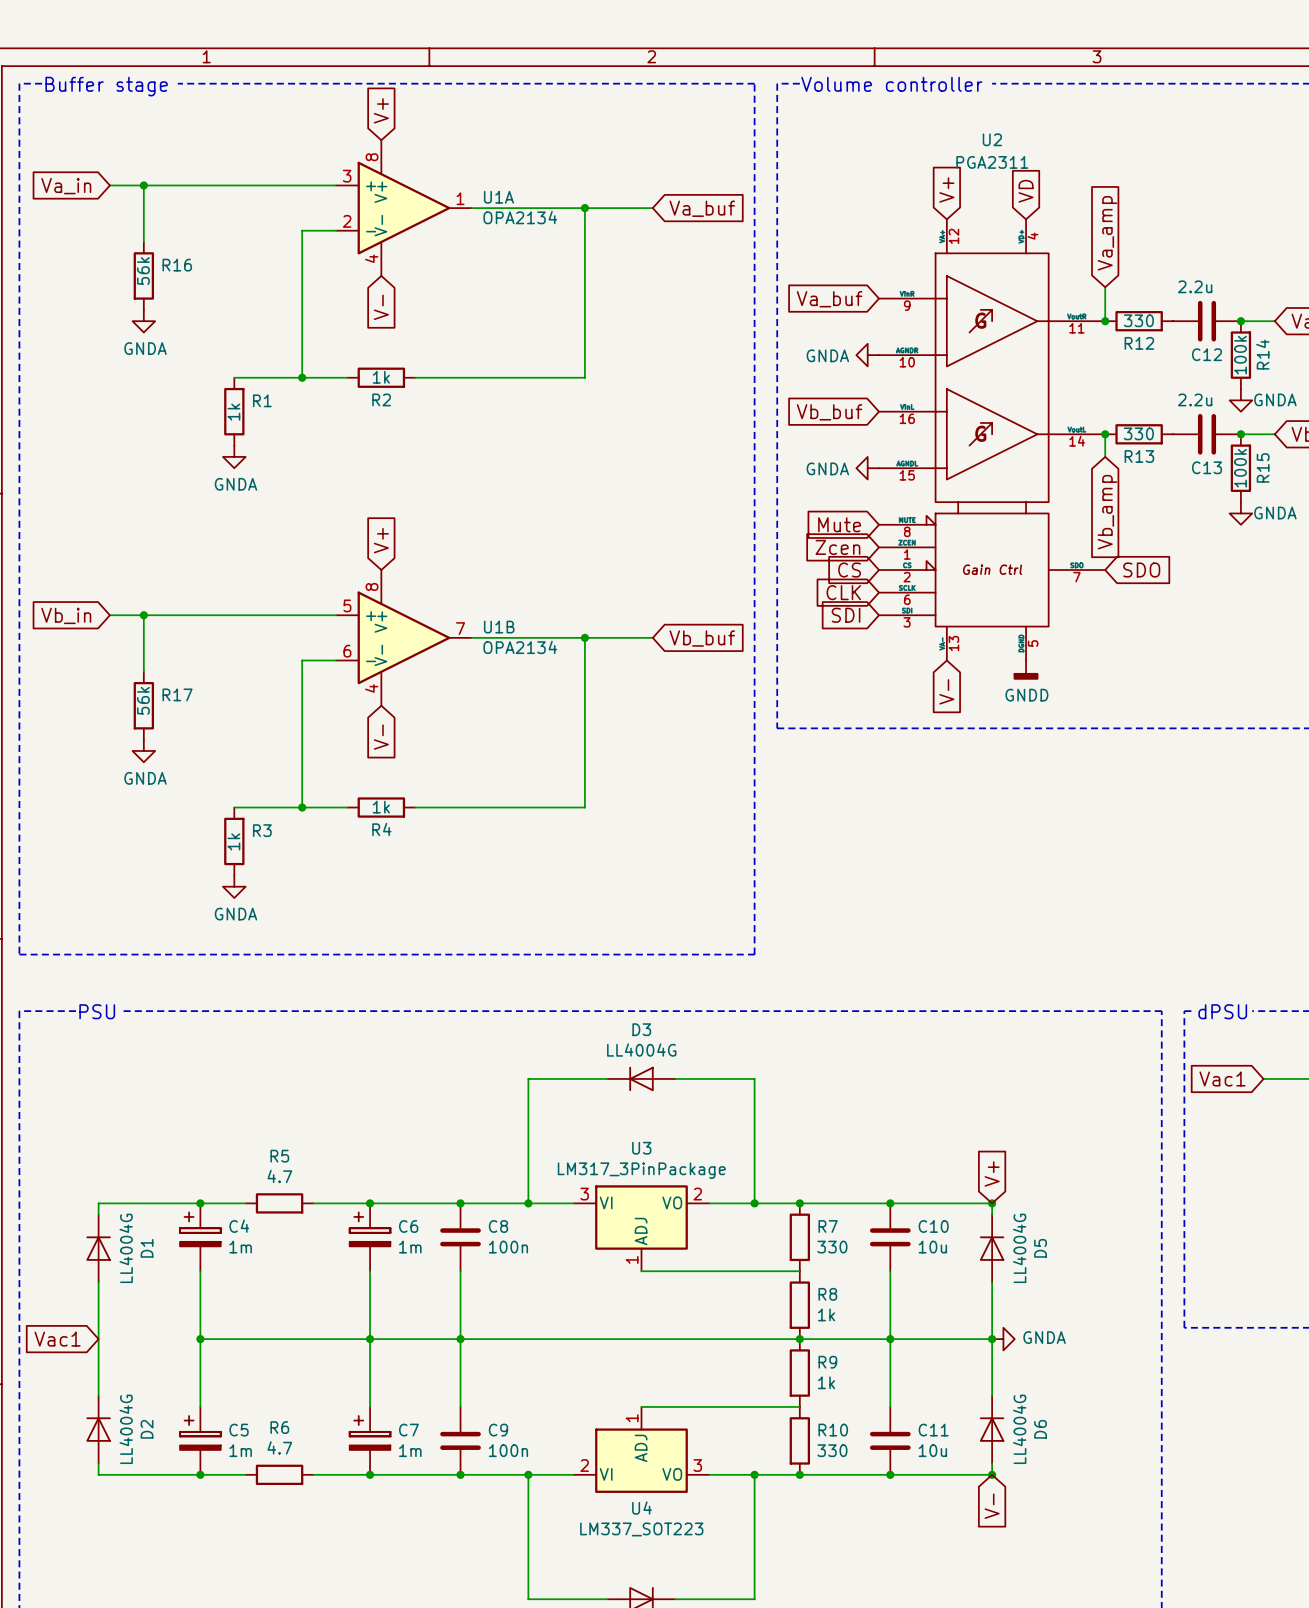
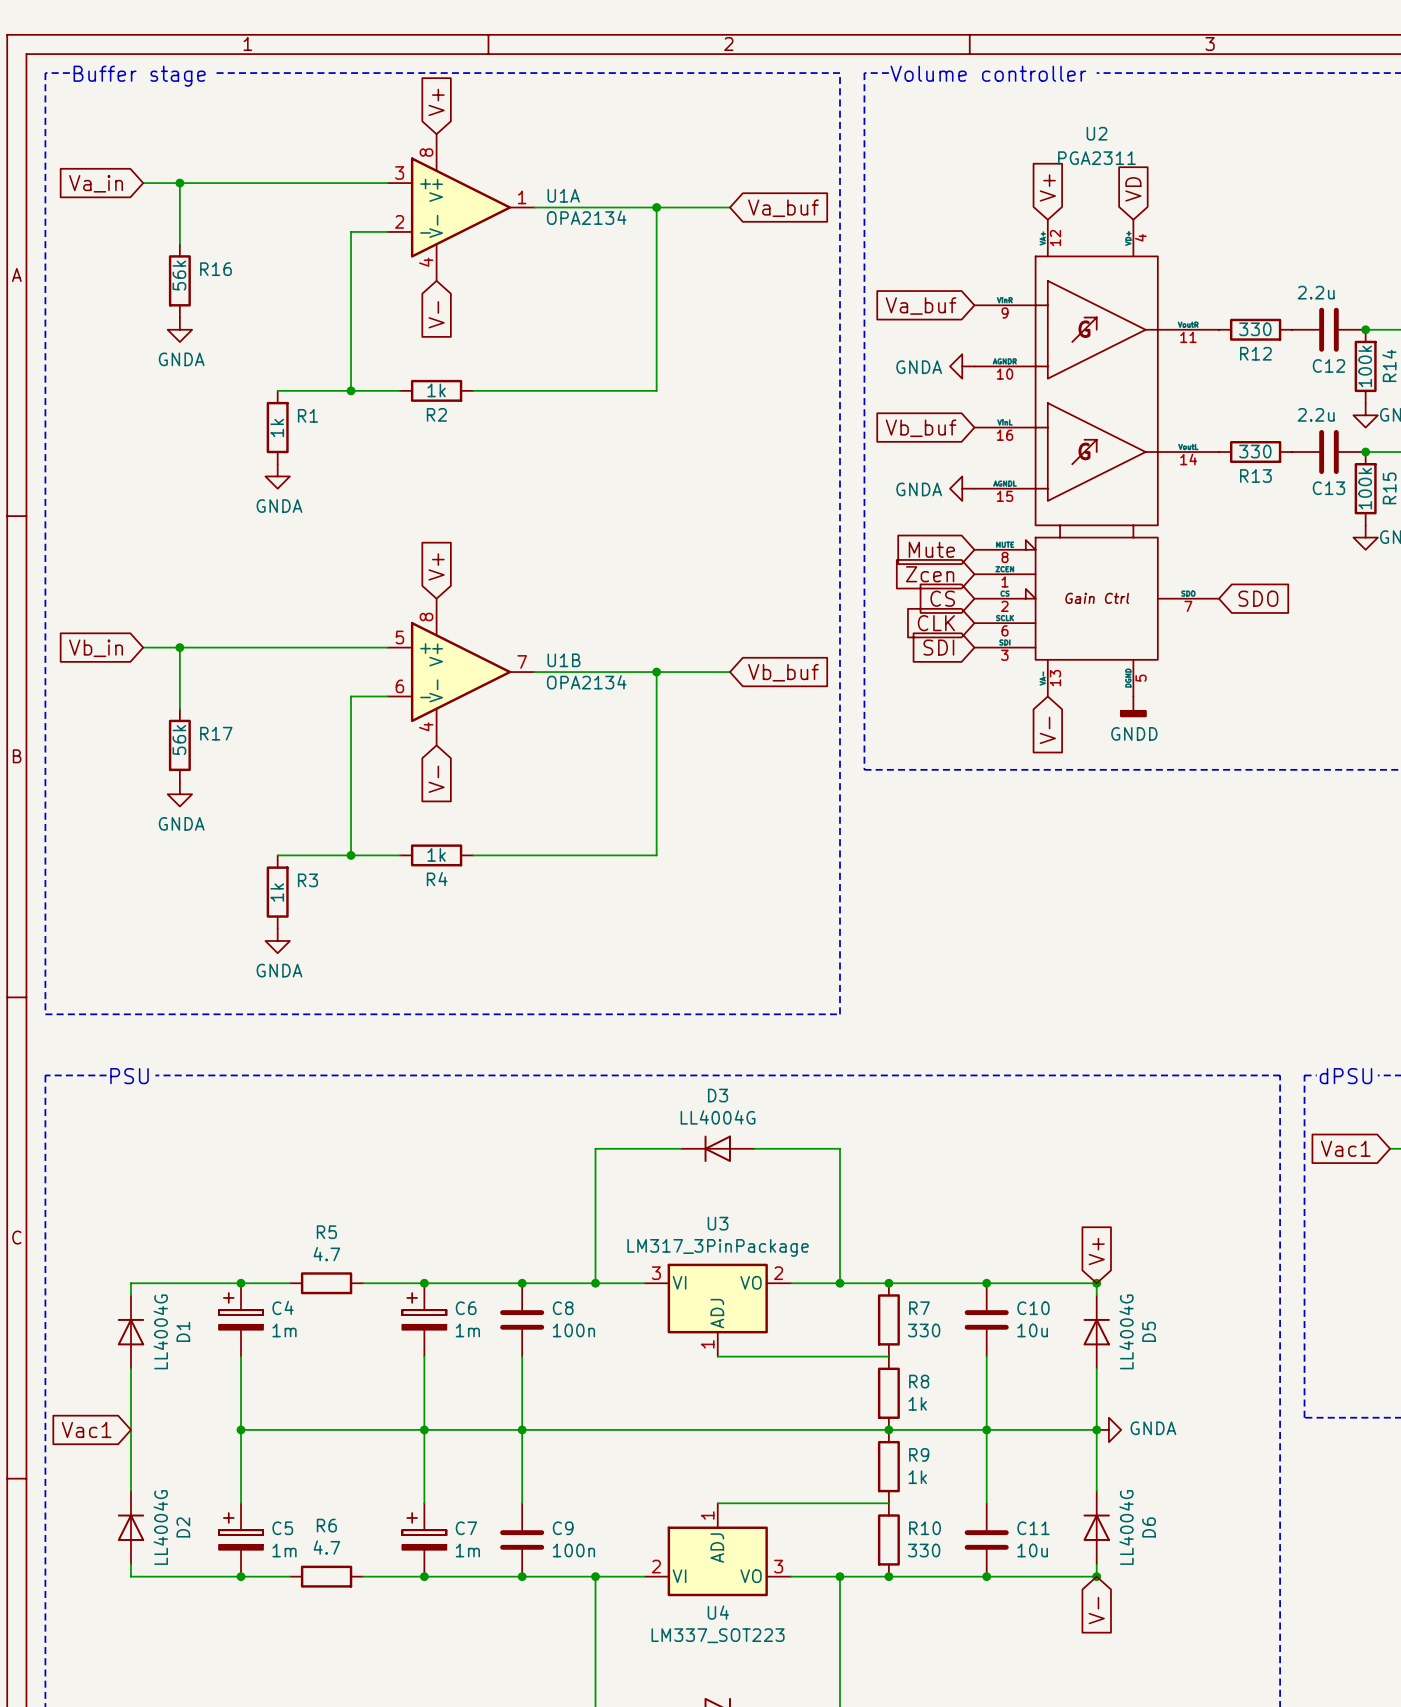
global label: Va_amp (1107, 233) -> none
wire: (1105, 287) (1105, 321) -> none
junction: (1105, 321) -> none
wire: (1105, 434) (1105, 456) -> none
junction: (1105, 434) -> none
global label: Vb_amp (1107, 512) -> none

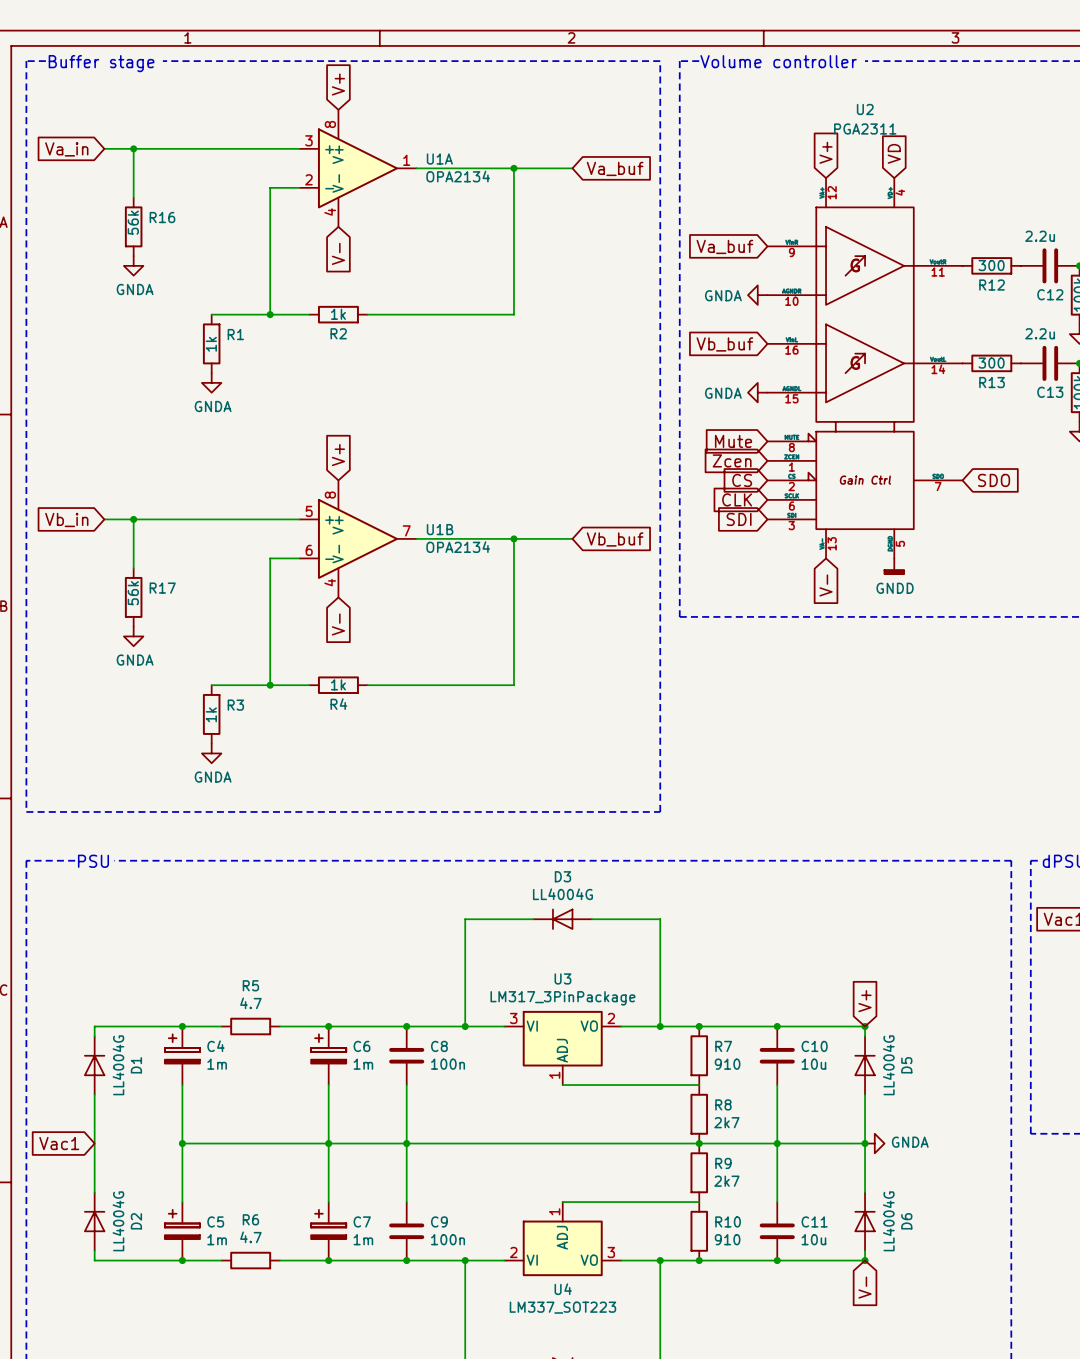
R12 value: 330 (1255, 329) -> 300 (991, 265)
R13 value: 330 (1255, 451) -> 300 (991, 363)
R7 value: 330 (924, 1330) -> 910 (727, 1064)
R8 value: 1k (917, 1403) -> 2k7 (726, 1122)
R9 value: 1k (917, 1477) -> 2k7 (726, 1181)
R10 value: 330 (924, 1550) -> 910 (727, 1239)

